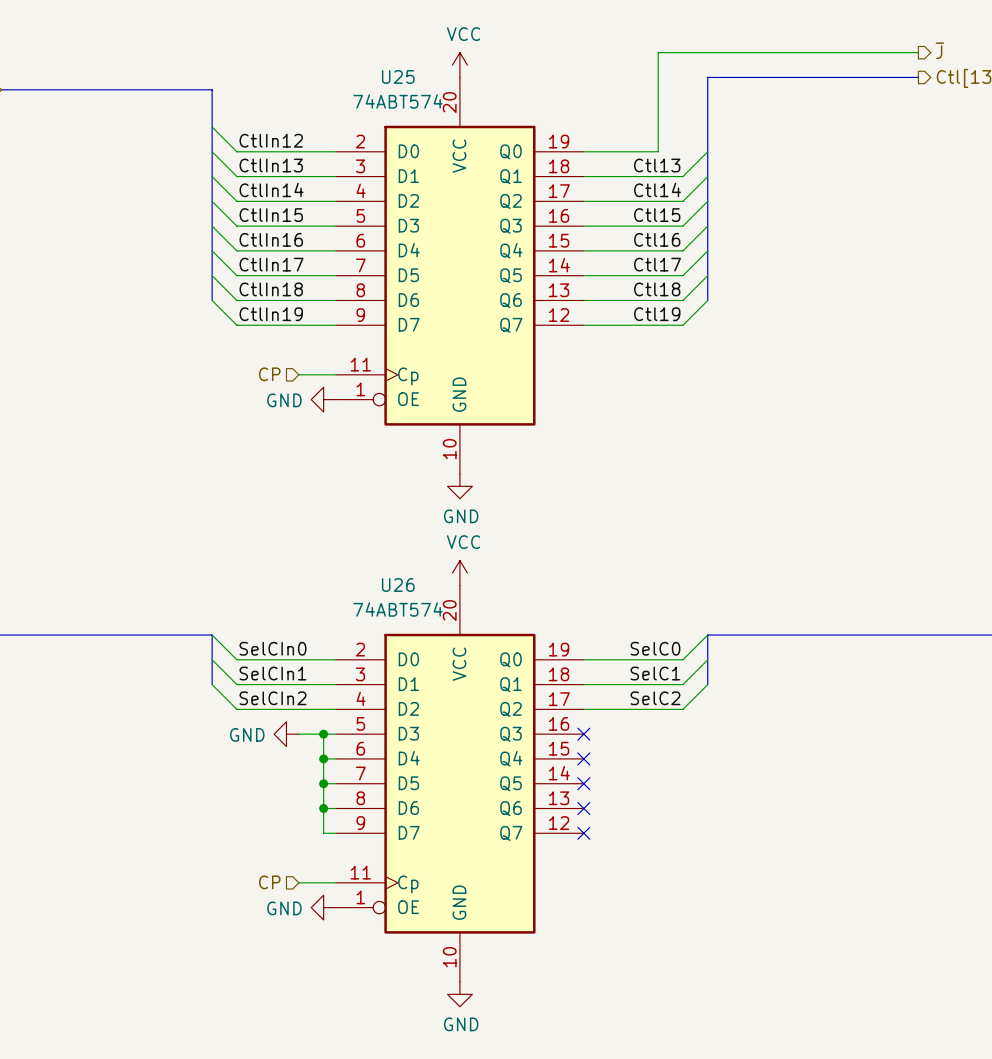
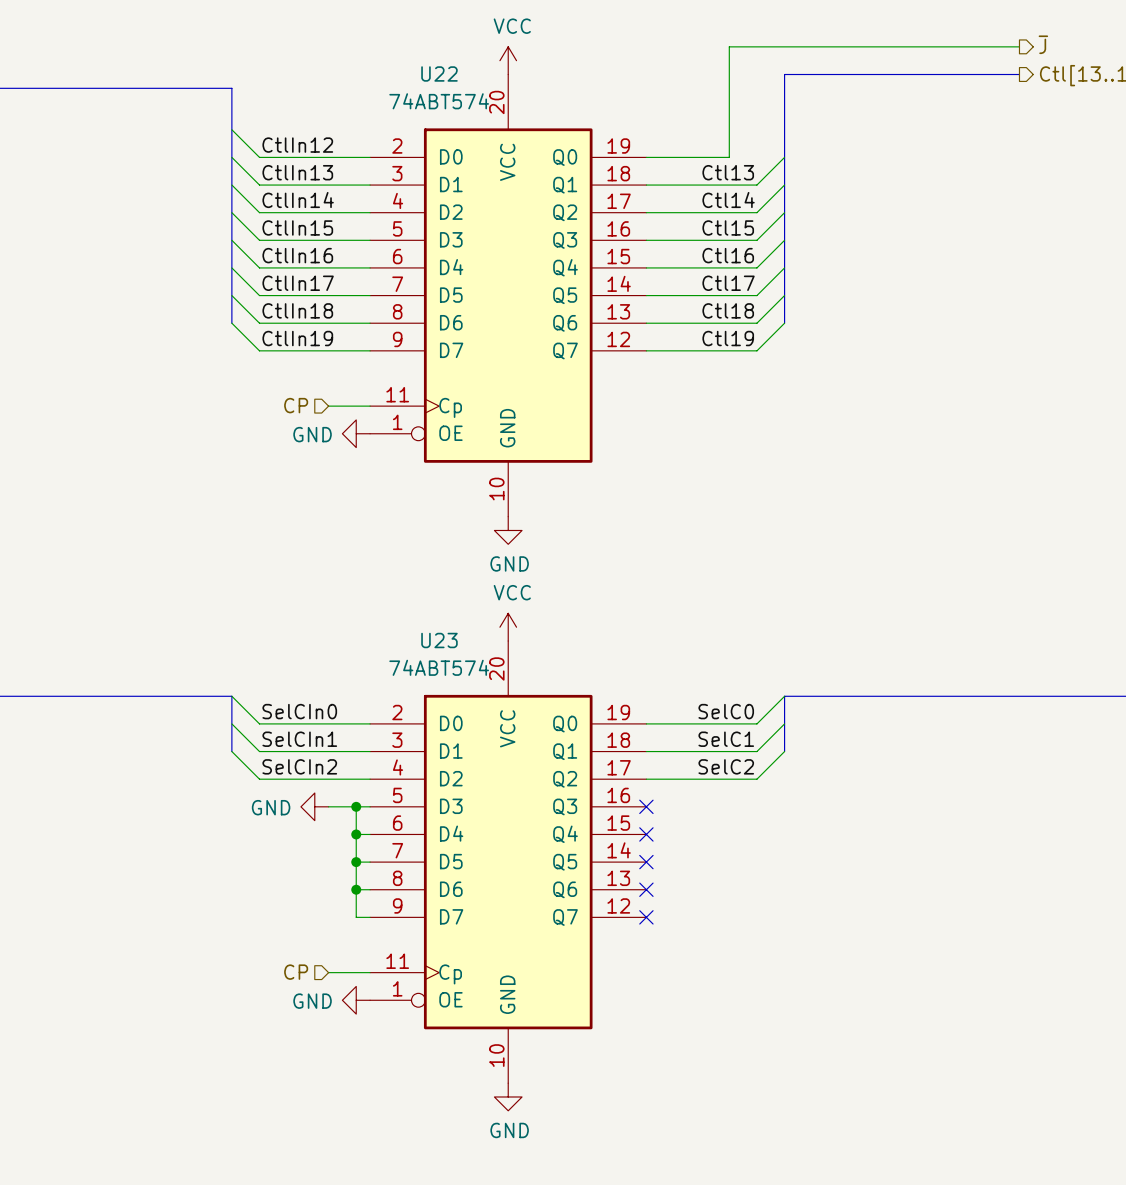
U25 name: U25 (398, 76) -> U22 (439, 73)
U26 name: U26 (398, 585) -> U23 (439, 640)

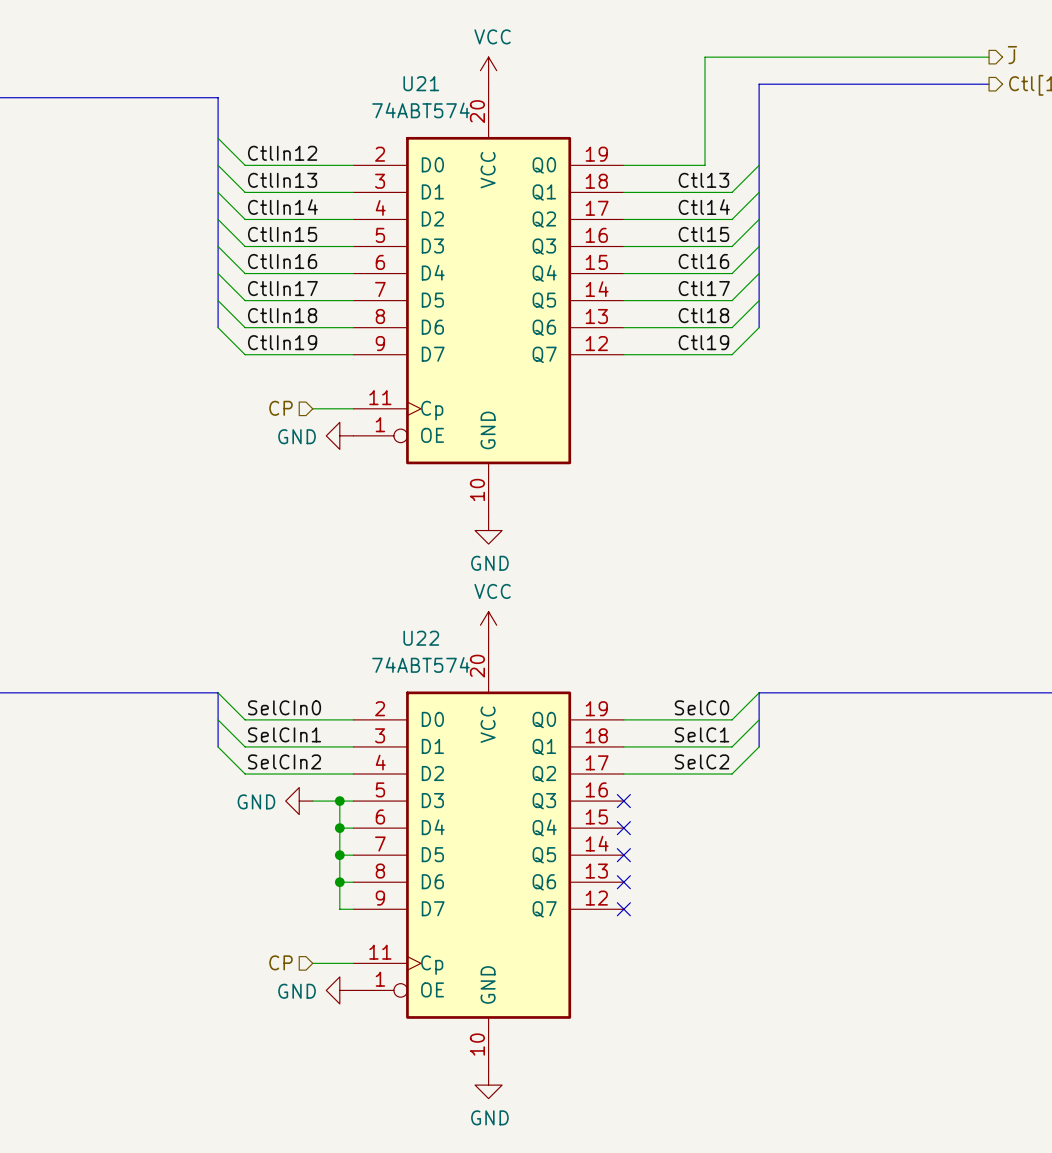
U22 name: U22 (439, 73) -> U21 (421, 83)
U23 name: U23 (439, 640) -> U22 (421, 638)

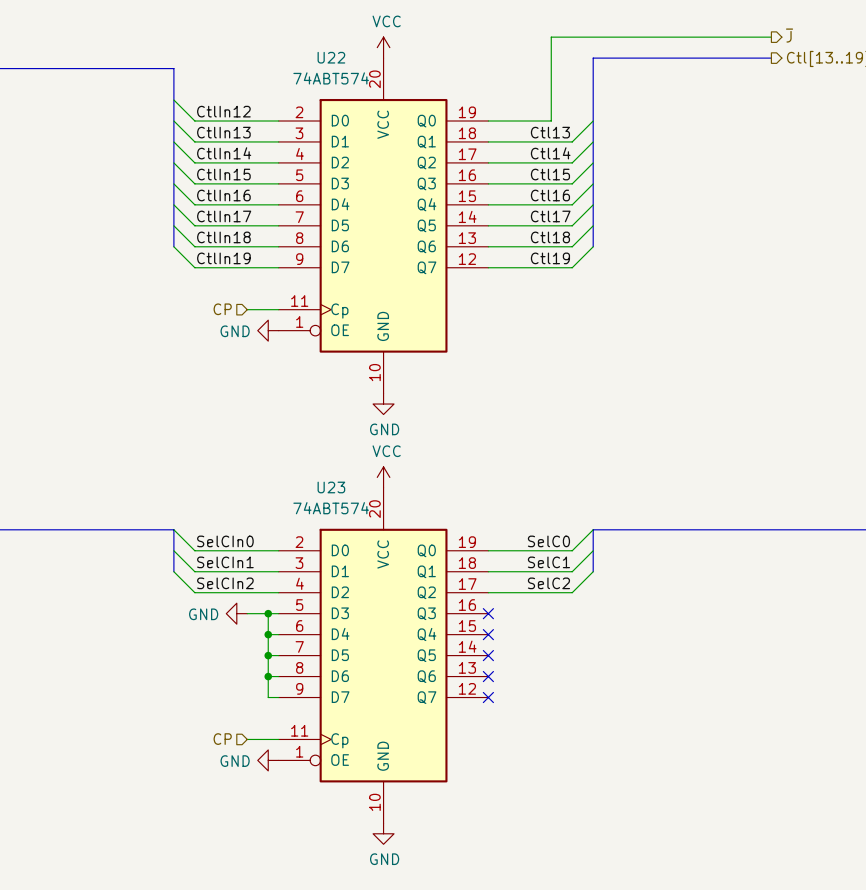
U21 name: U21 (421, 83) -> U22 (331, 57)
U22 name: U22 (421, 638) -> U23 (331, 487)

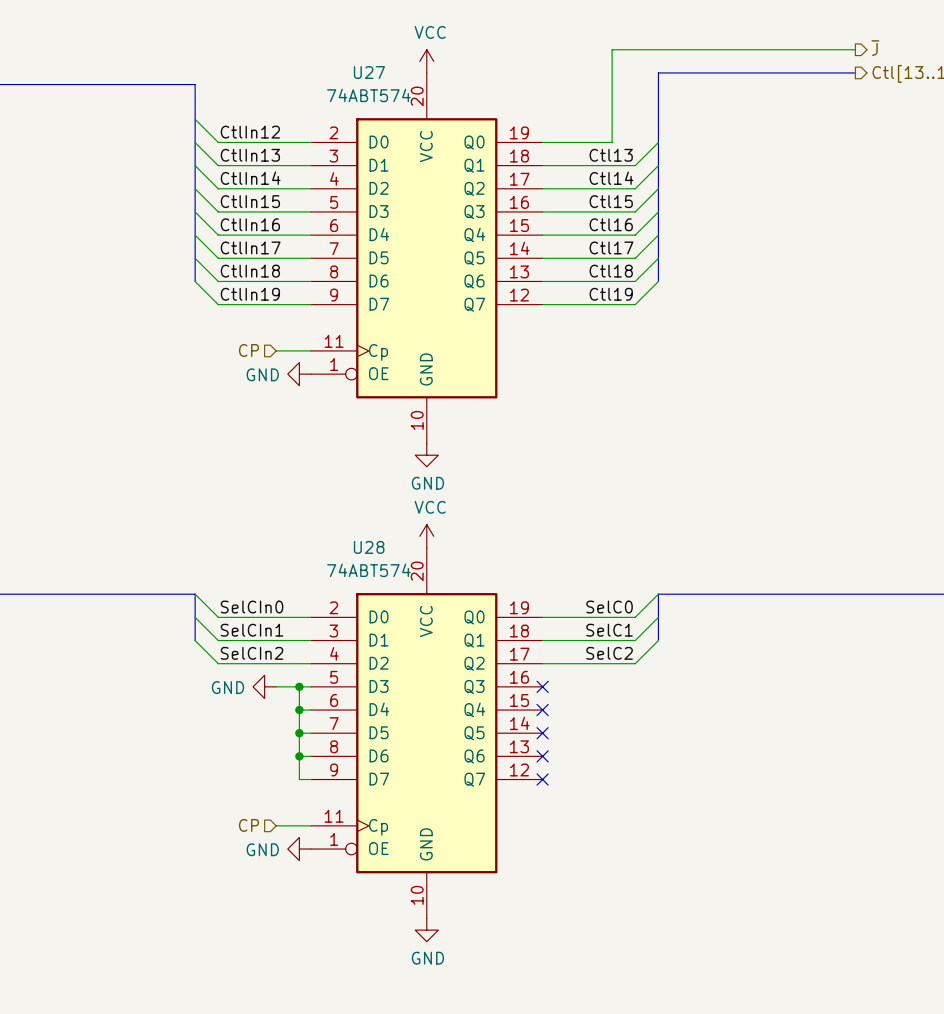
U22 name: U22 (331, 57) -> U27 (369, 72)
U23 name: U23 (331, 487) -> U28 (369, 547)

